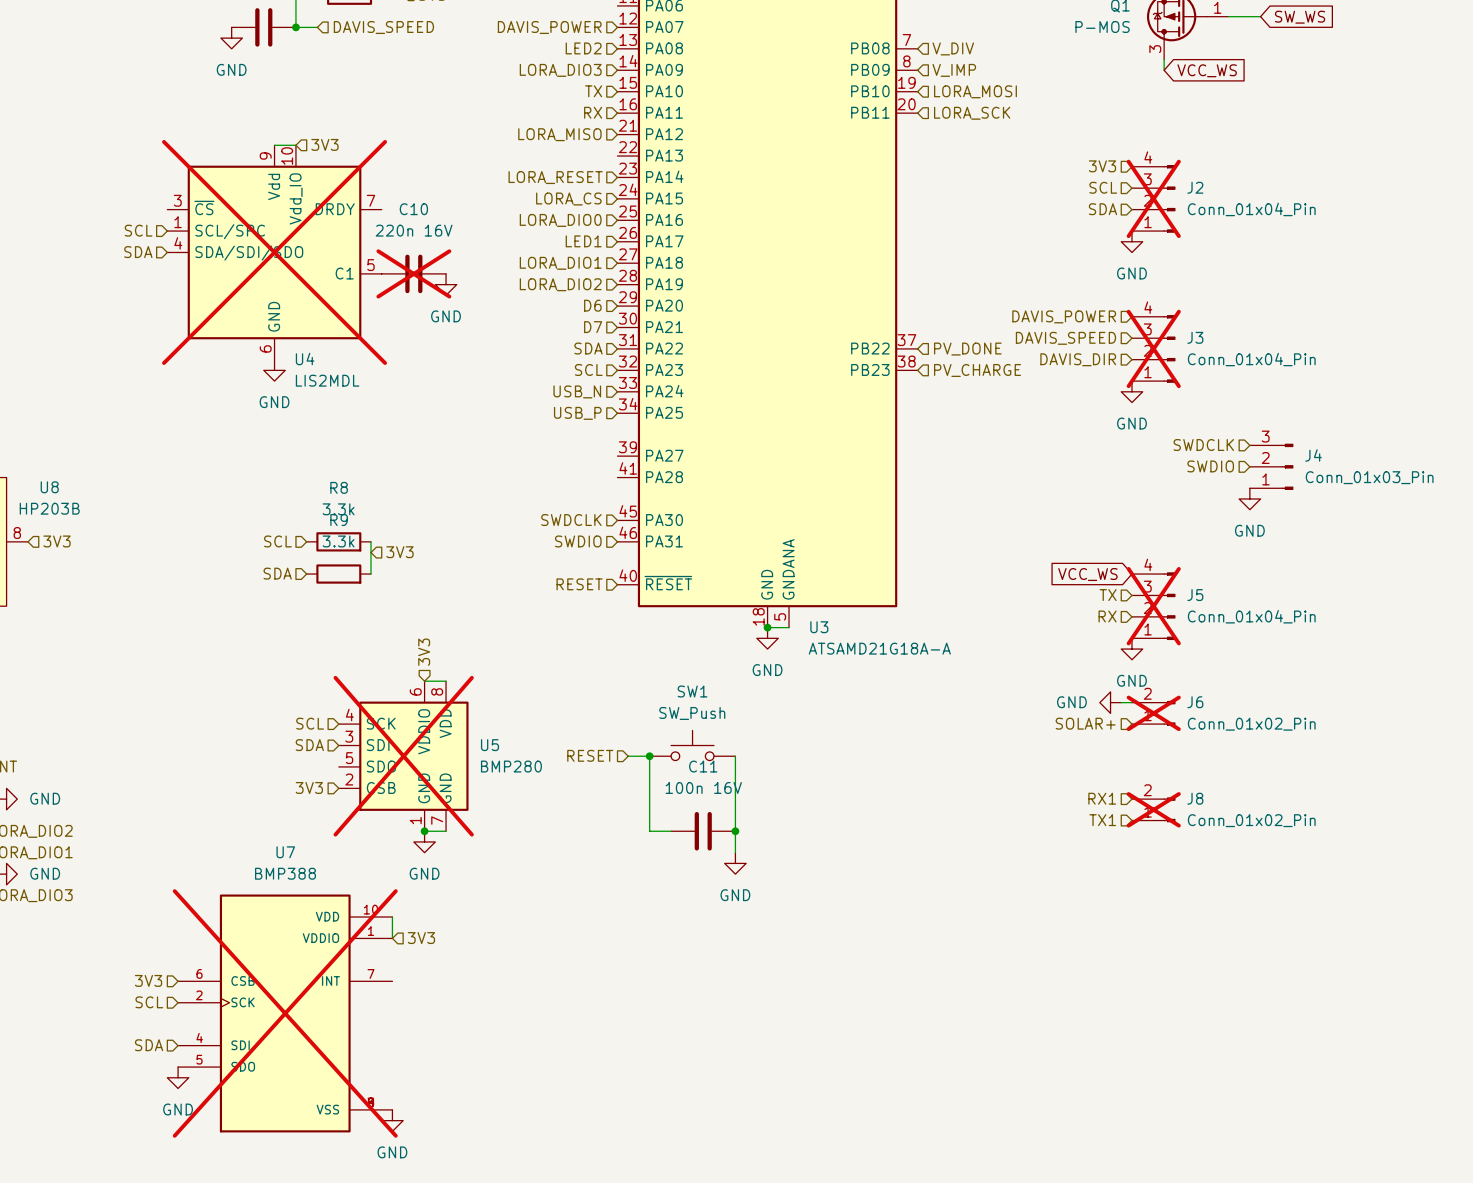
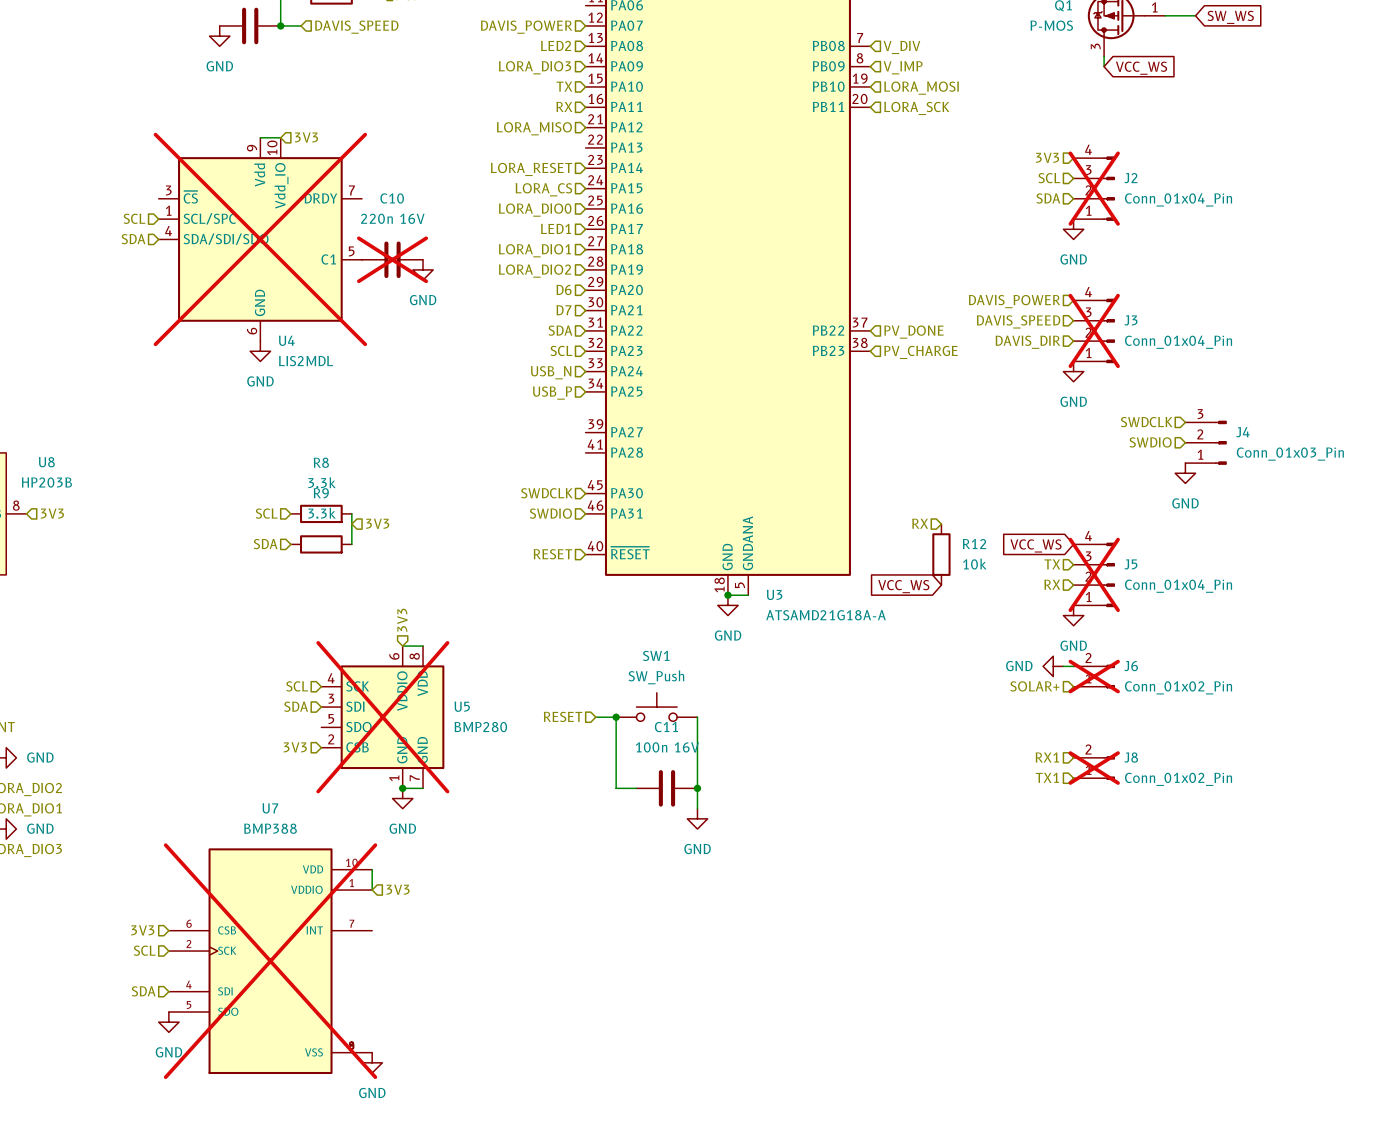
hierarchical label: none -> RX (920, 523)
R12: none -> 10k (941, 554)
global label: none -> VCC_WS (903, 586)

